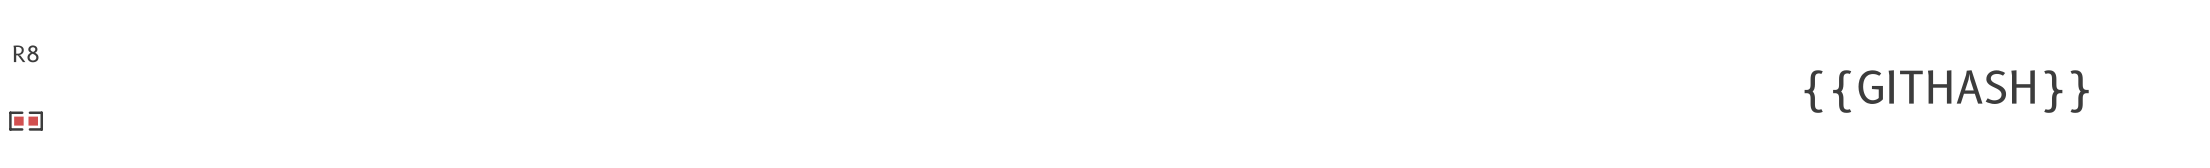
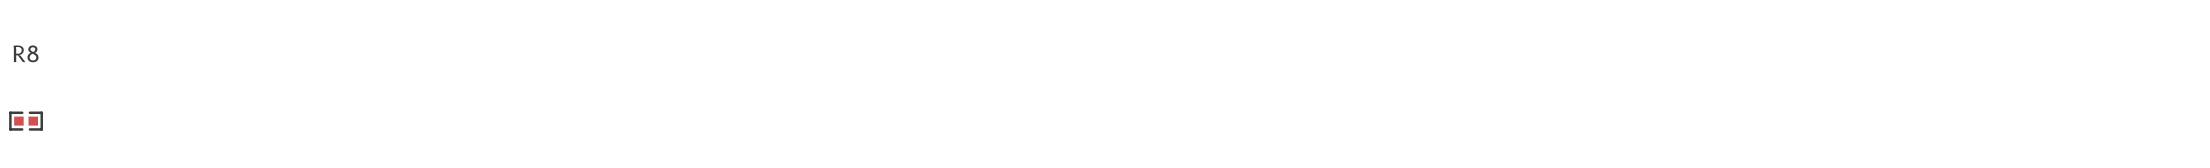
text: {{GITHASH}} (1946, 91) -> none

